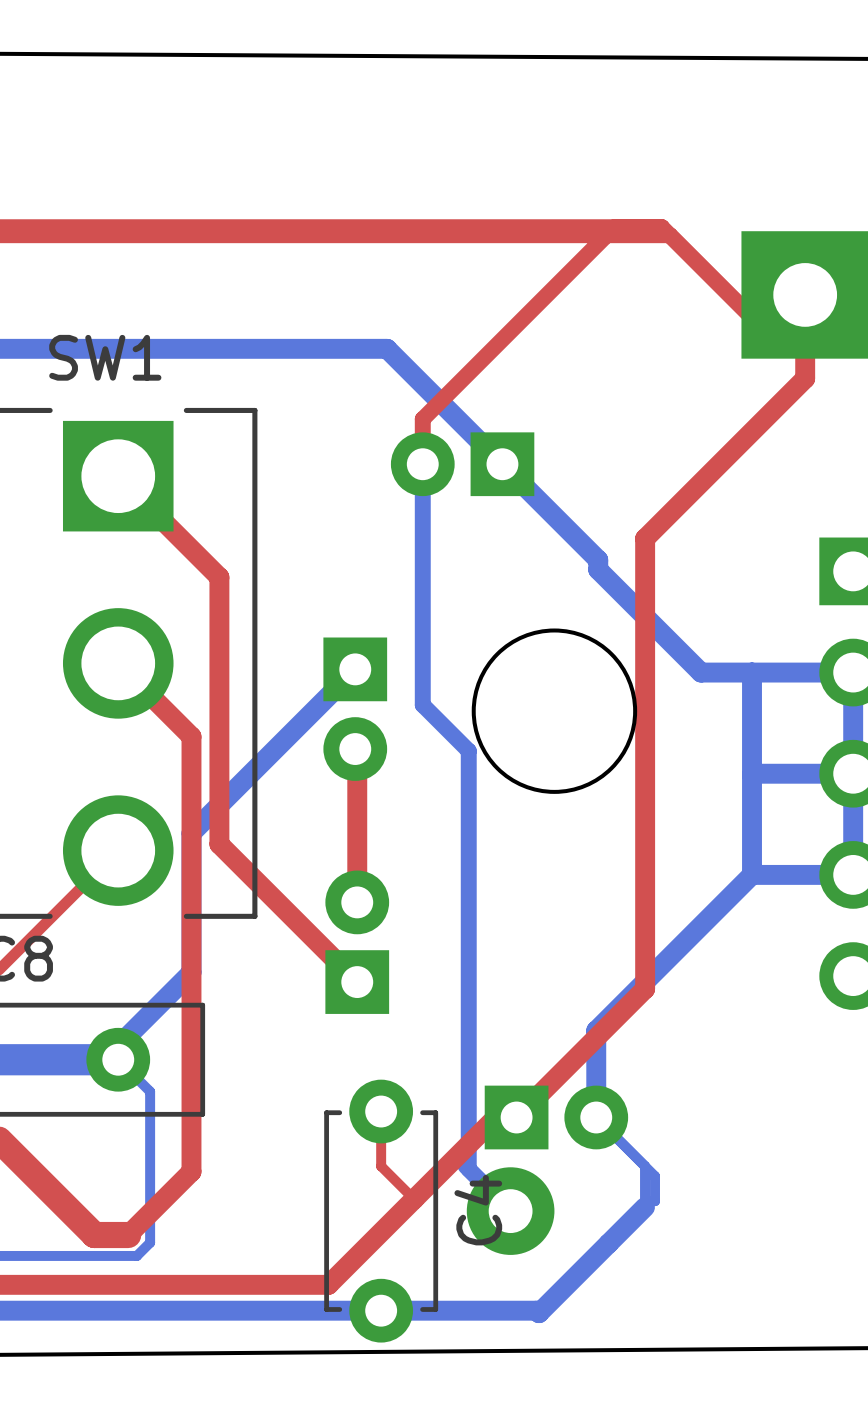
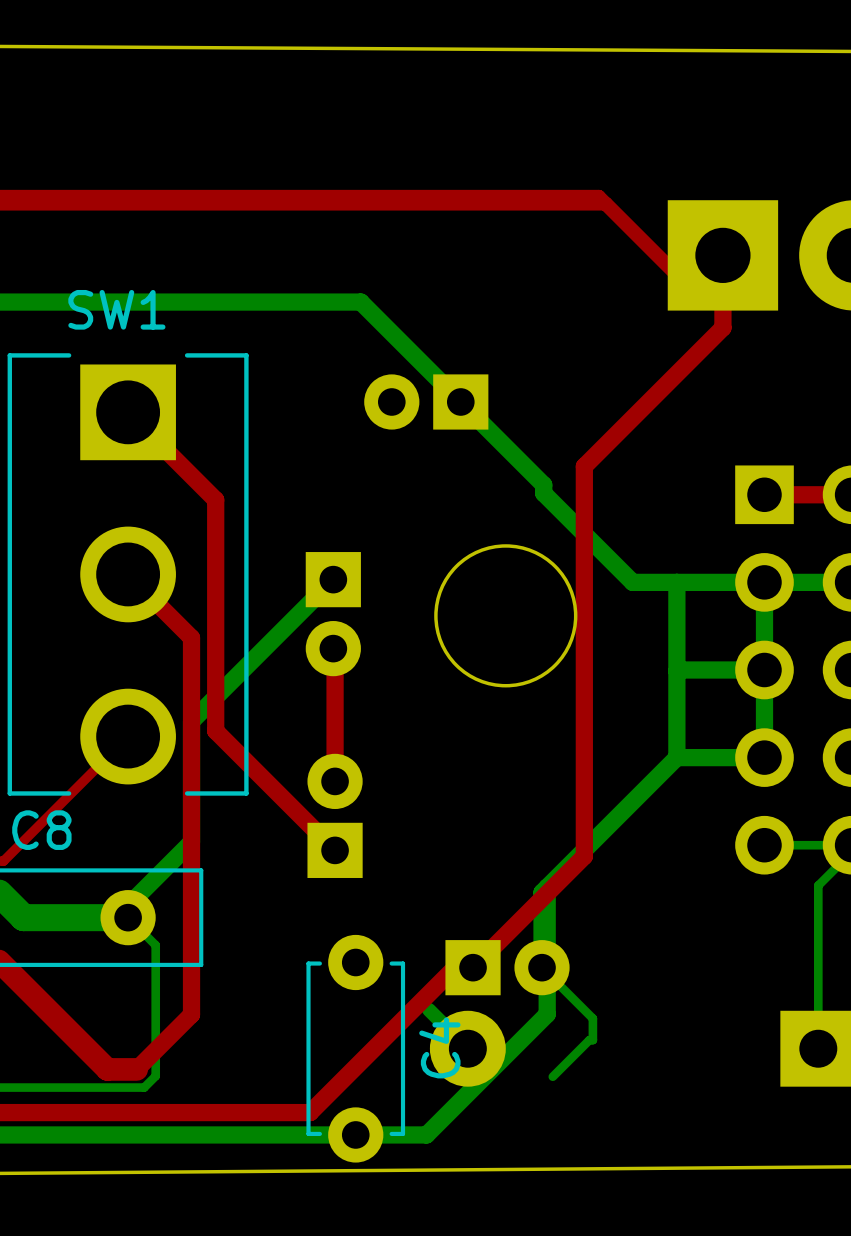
top track: (614, 227) (422, 419) (422, 464) -> none
bottom track: (422, 464) (422, 705) (468, 750) (468, 1169) (510, 1211) -> none
top track: (381, 1111) (381, 1166) (414, 1199) -> none
bottom track: (645, 1166) (645, 1207) (538, 1313) (536, 1310) (462, 1310) -> (547, 887) (547, 1014) (426, 1134)

